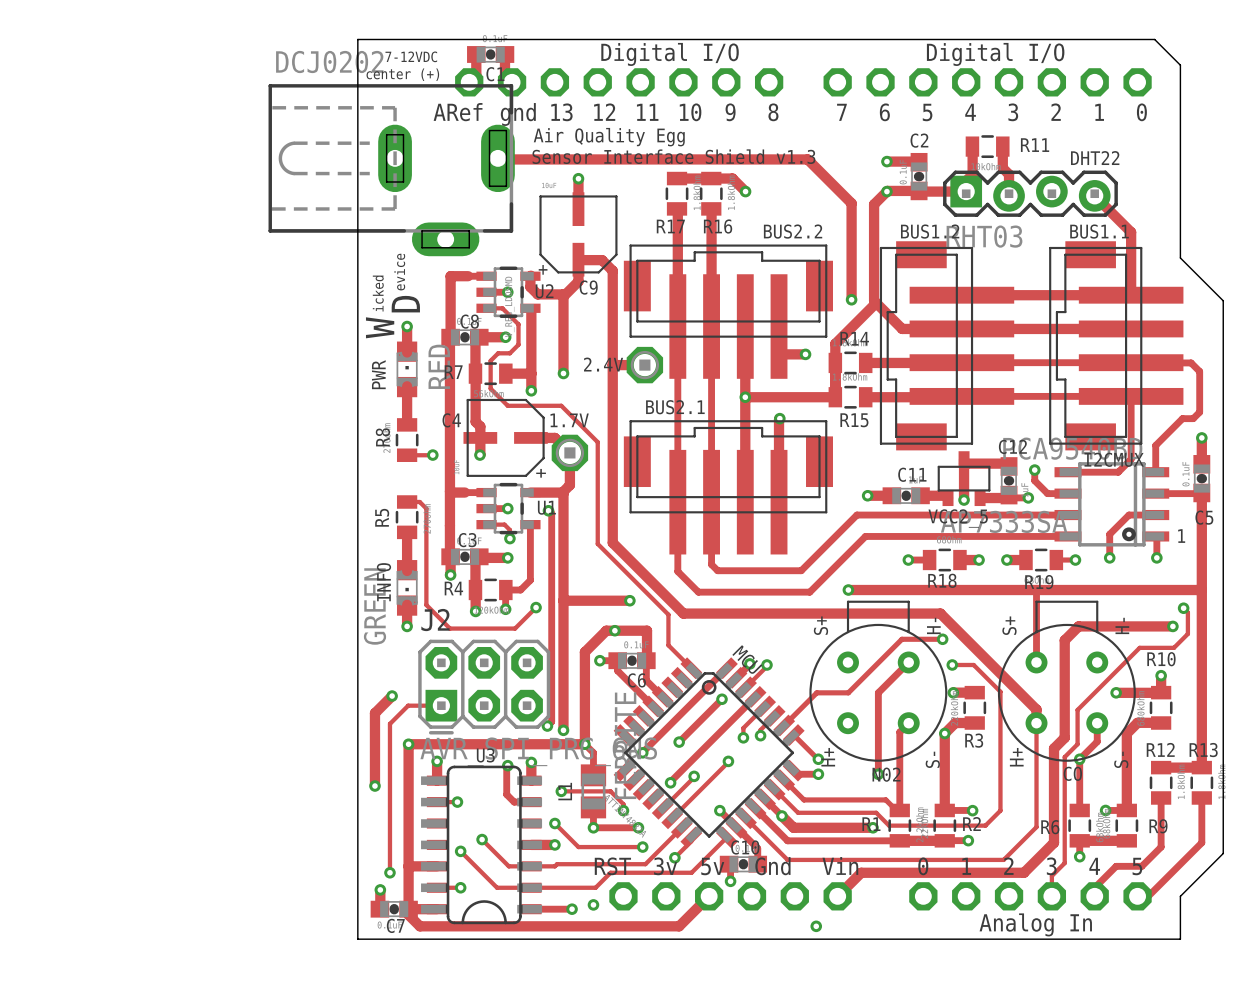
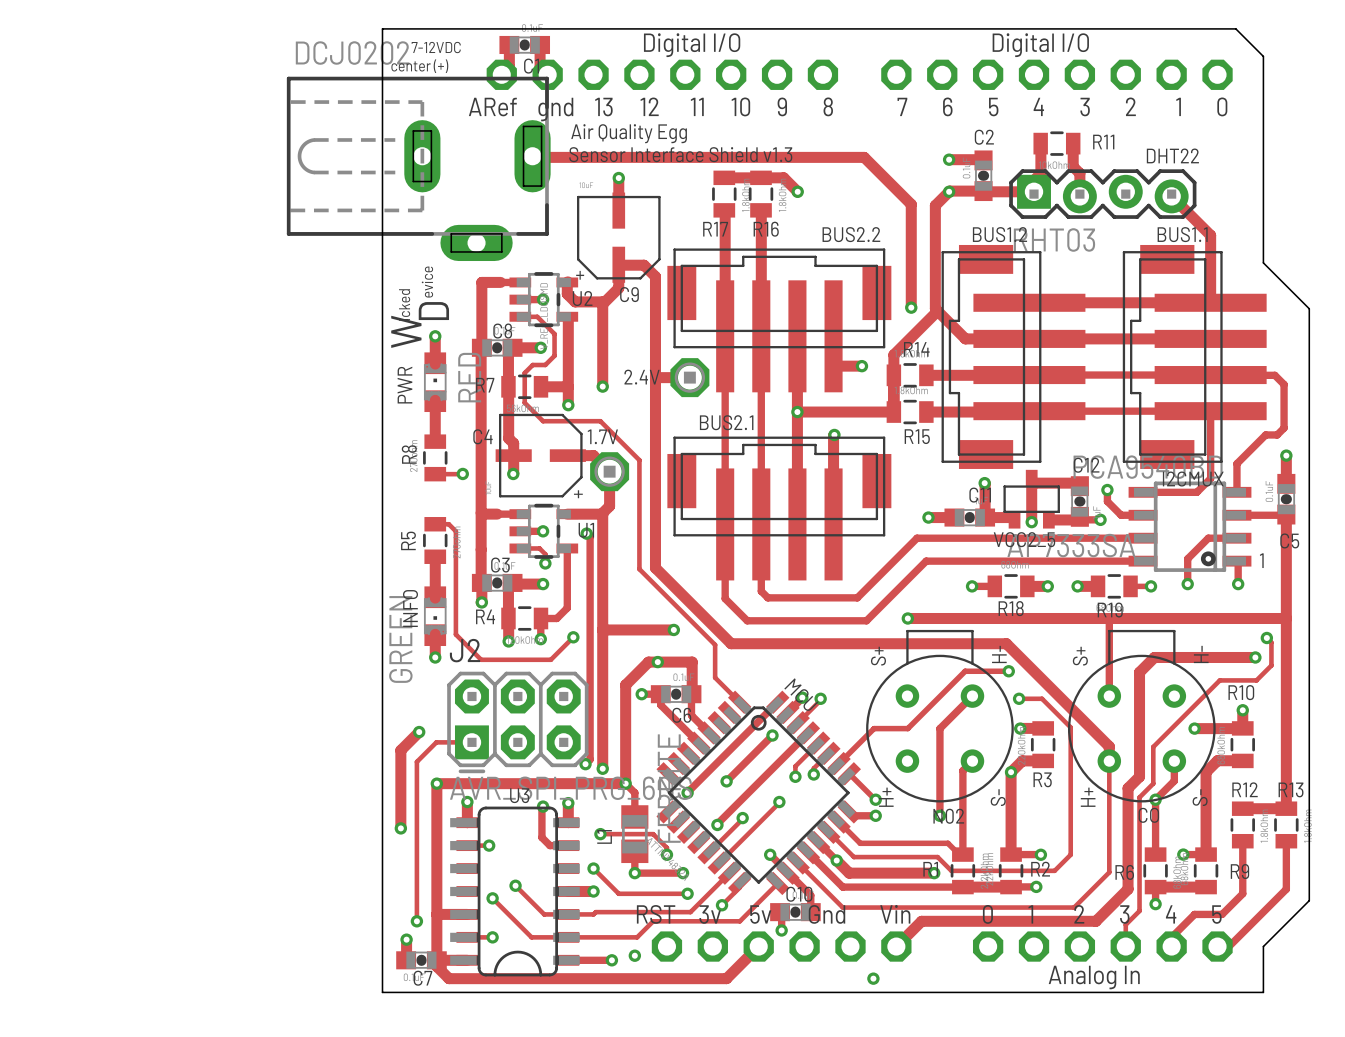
track: none -> (984, 483) (985, 517)
via: none -> (984, 483)

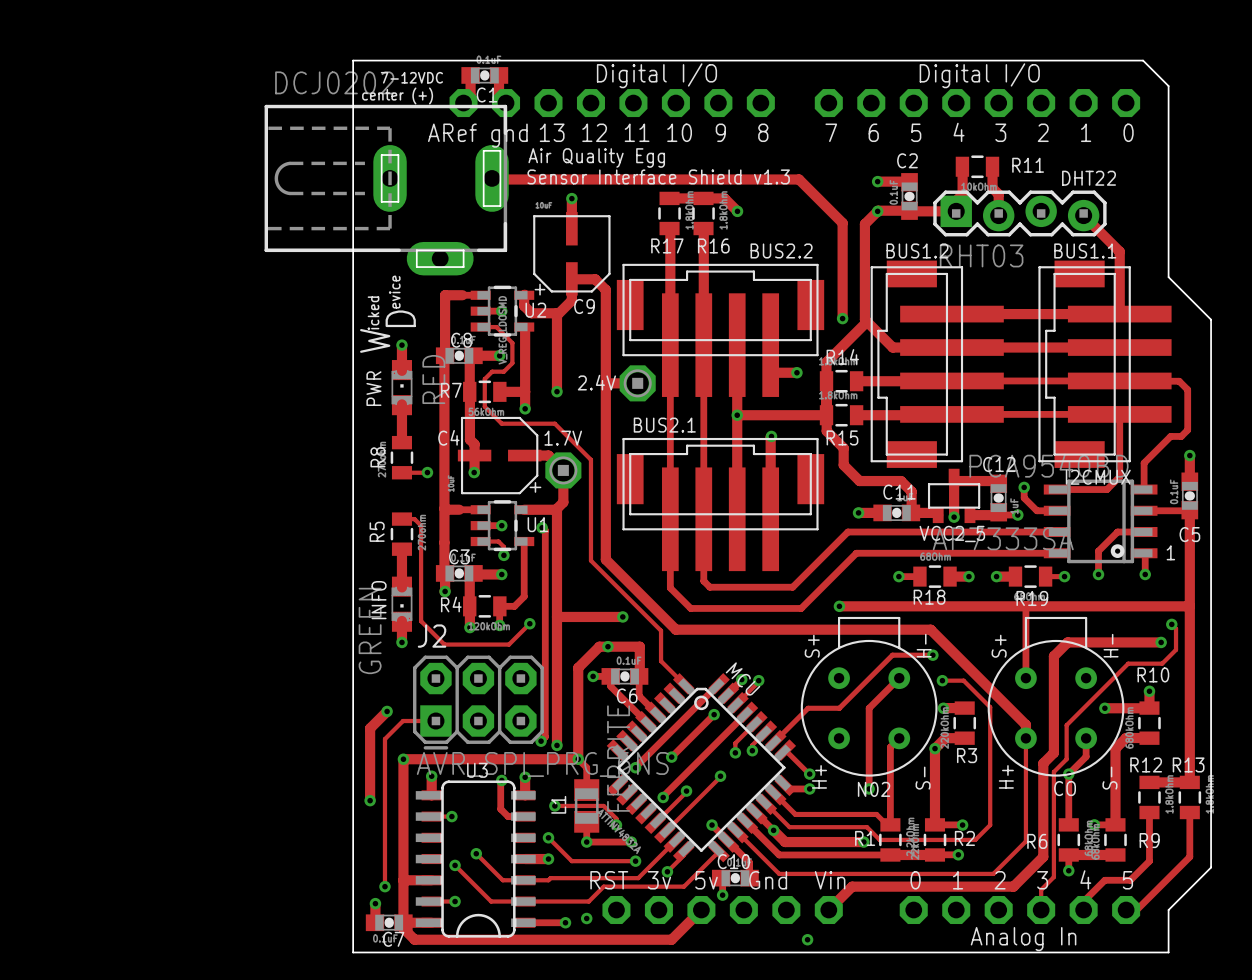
track: (984, 483) (985, 517) -> (826, 415) (826, 431) (843, 448) (843, 465) (859, 481) (901, 481) (911, 491) (910, 512)
via: (984, 483) -> none

